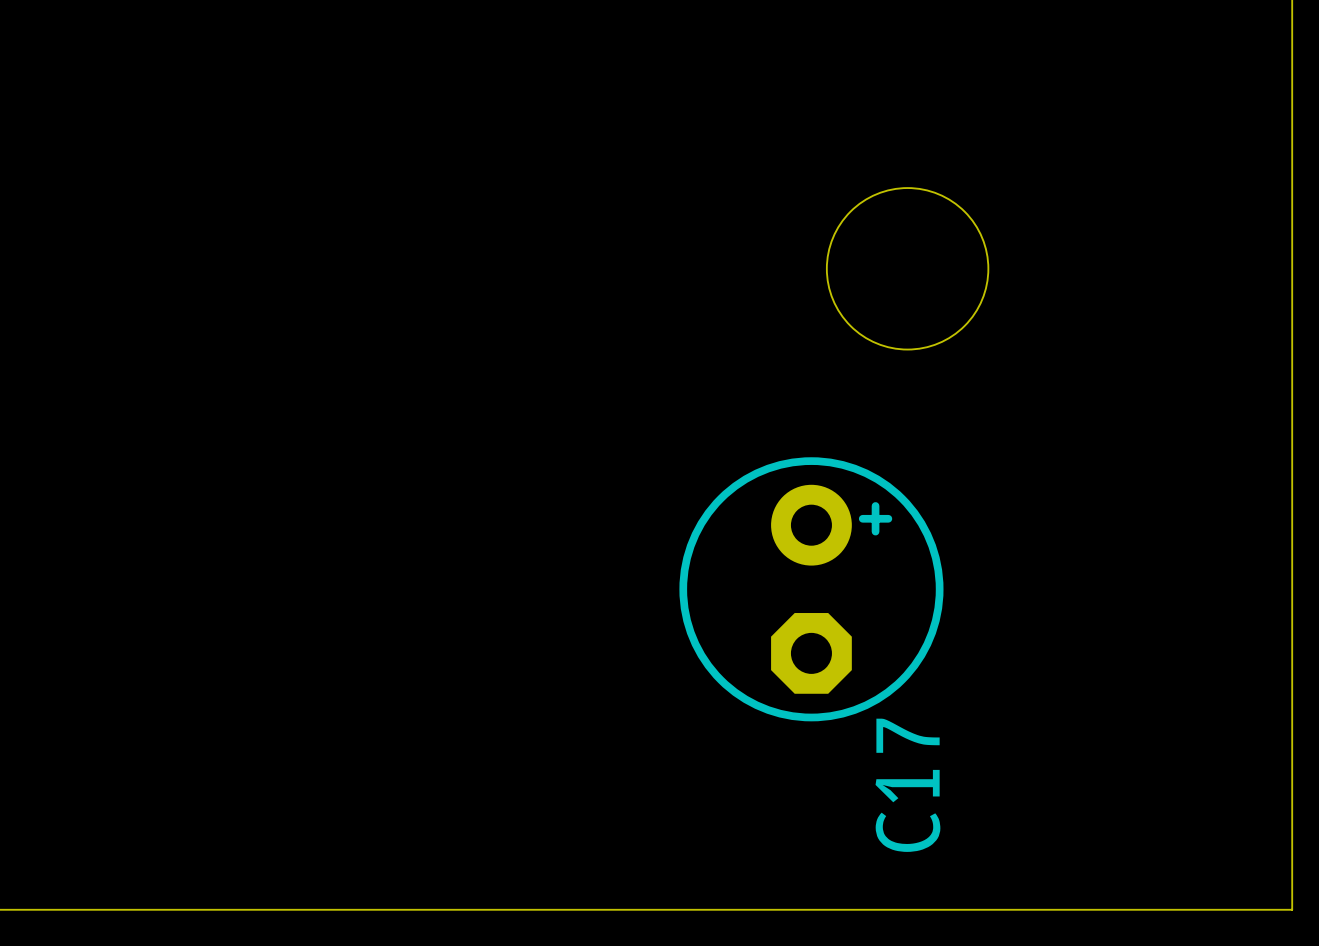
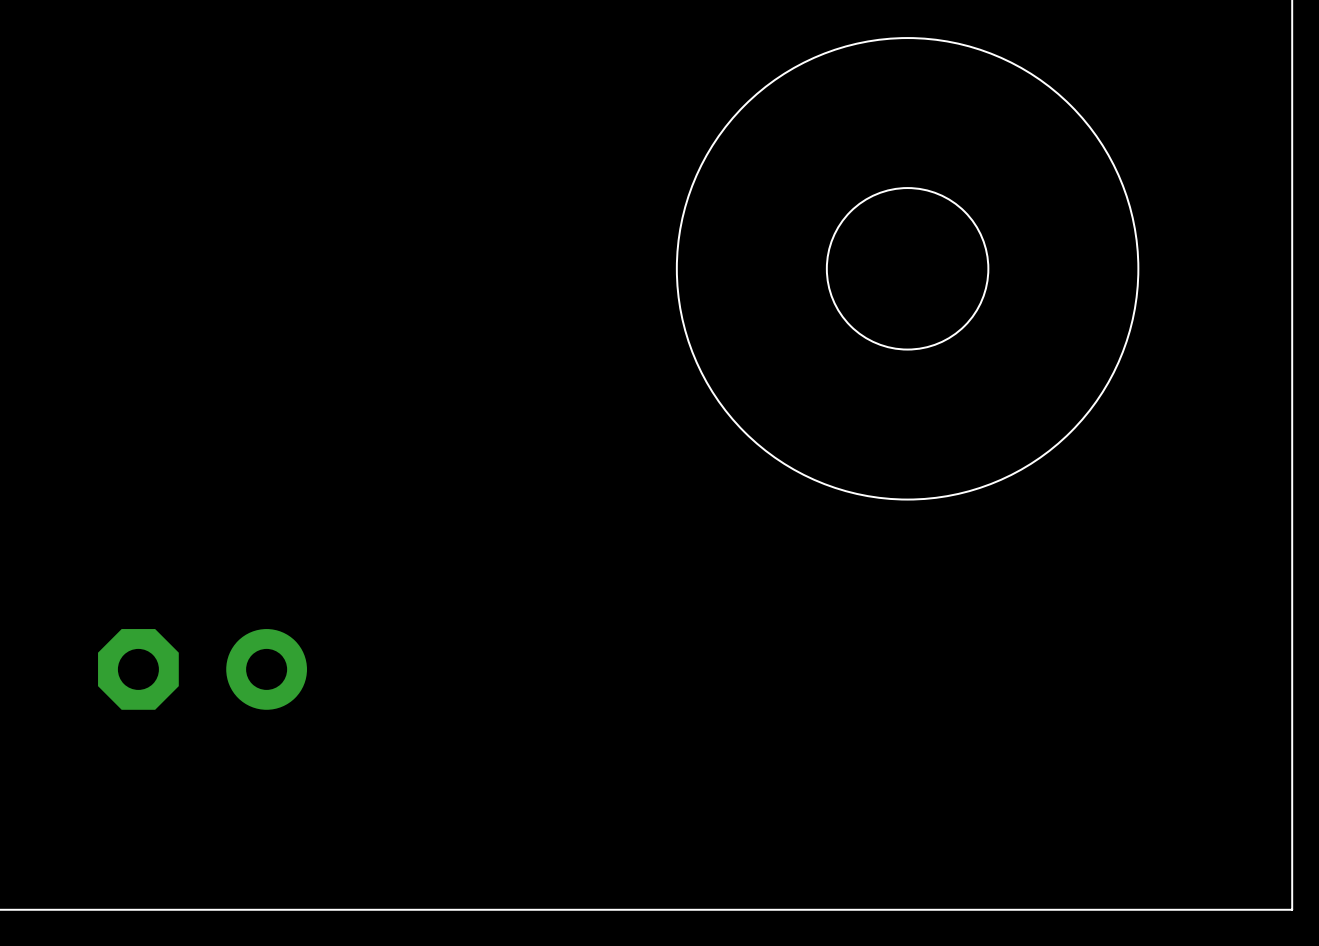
round board edge: none -> [676, 37, 1140, 501]
C17 side: bottom (811, 589) -> top (202, 669)

